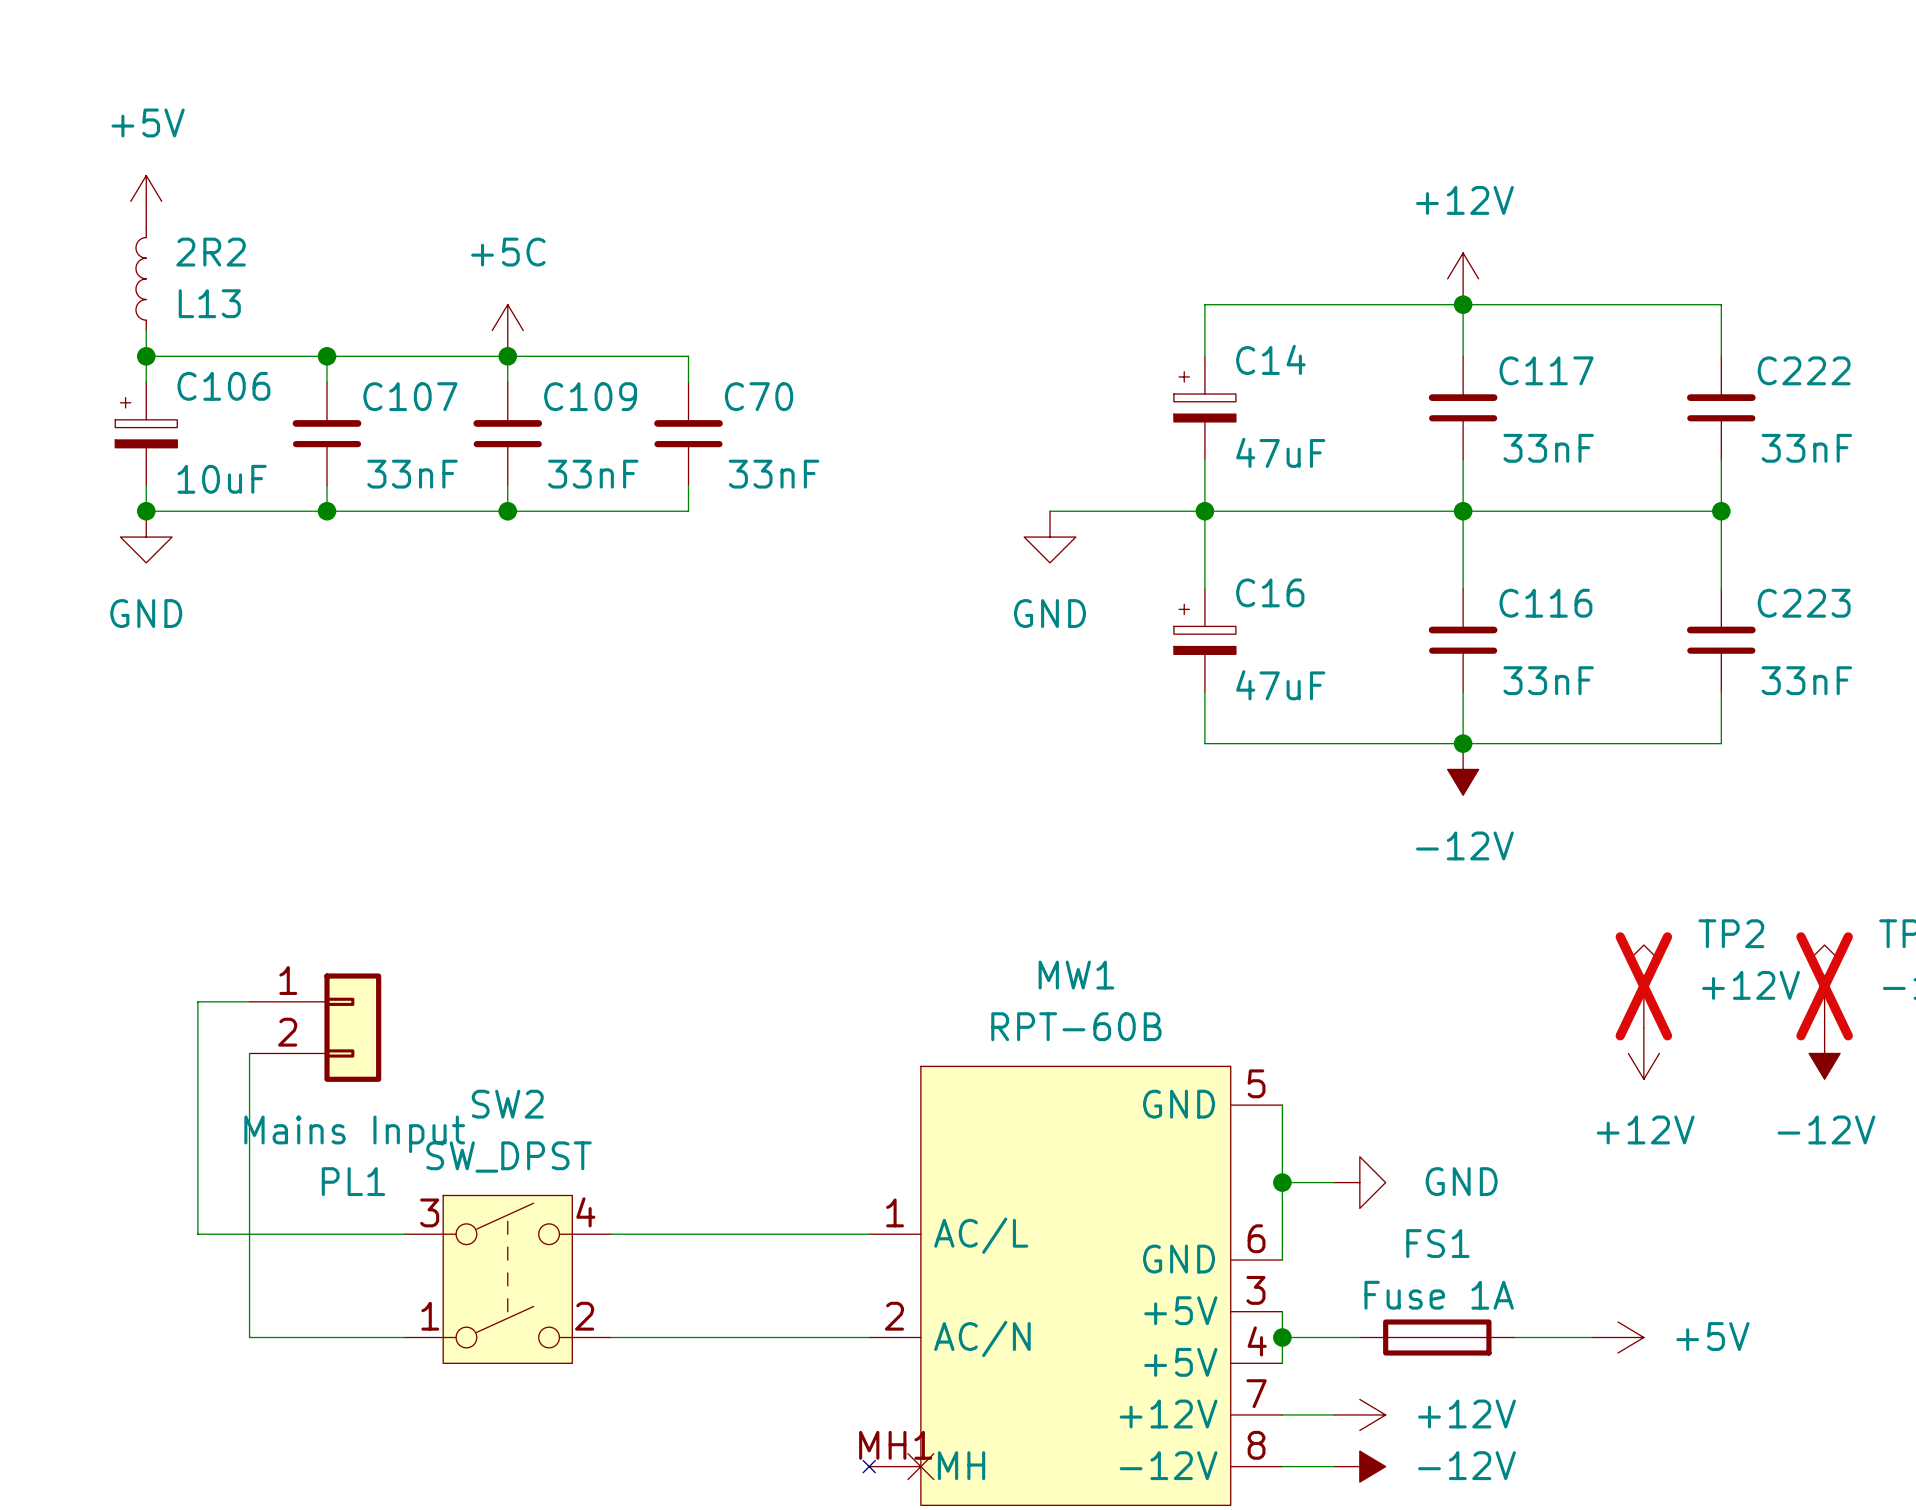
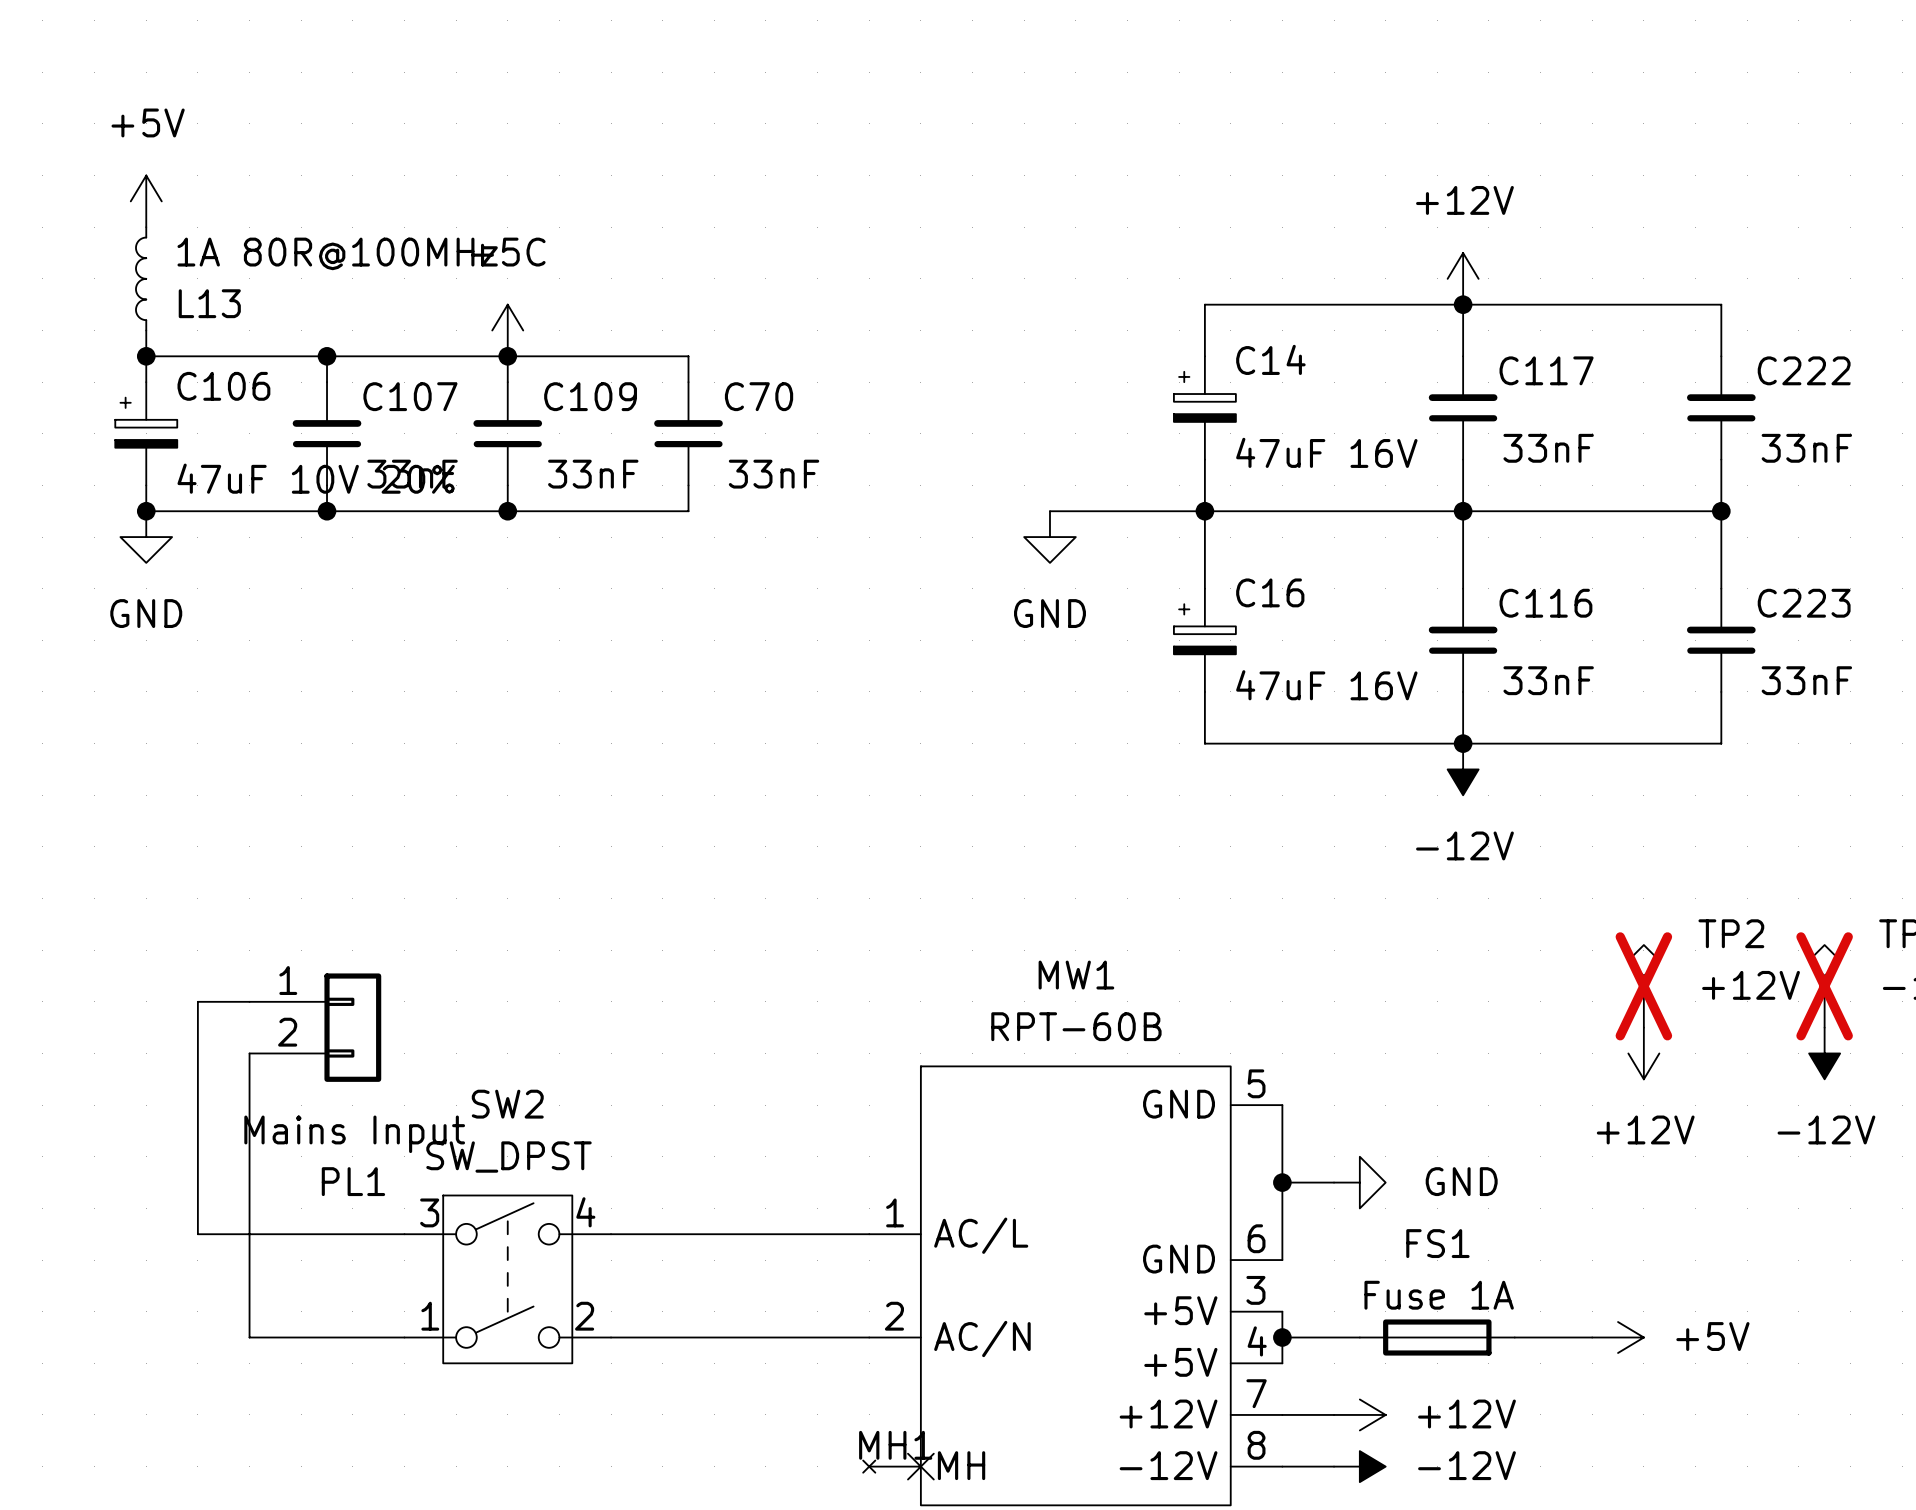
L13 value: 2R2 (211, 252) -> 1A 80R@100MHz (337, 253)
C14 value: 47uF (1280, 452) -> 47uF 16V (1326, 452)
C106 value: 10uF (222, 479) -> 47uF 10V 20% (316, 478)
C16 value: 47uF (1280, 685) -> 47uF 16V (1326, 685)

